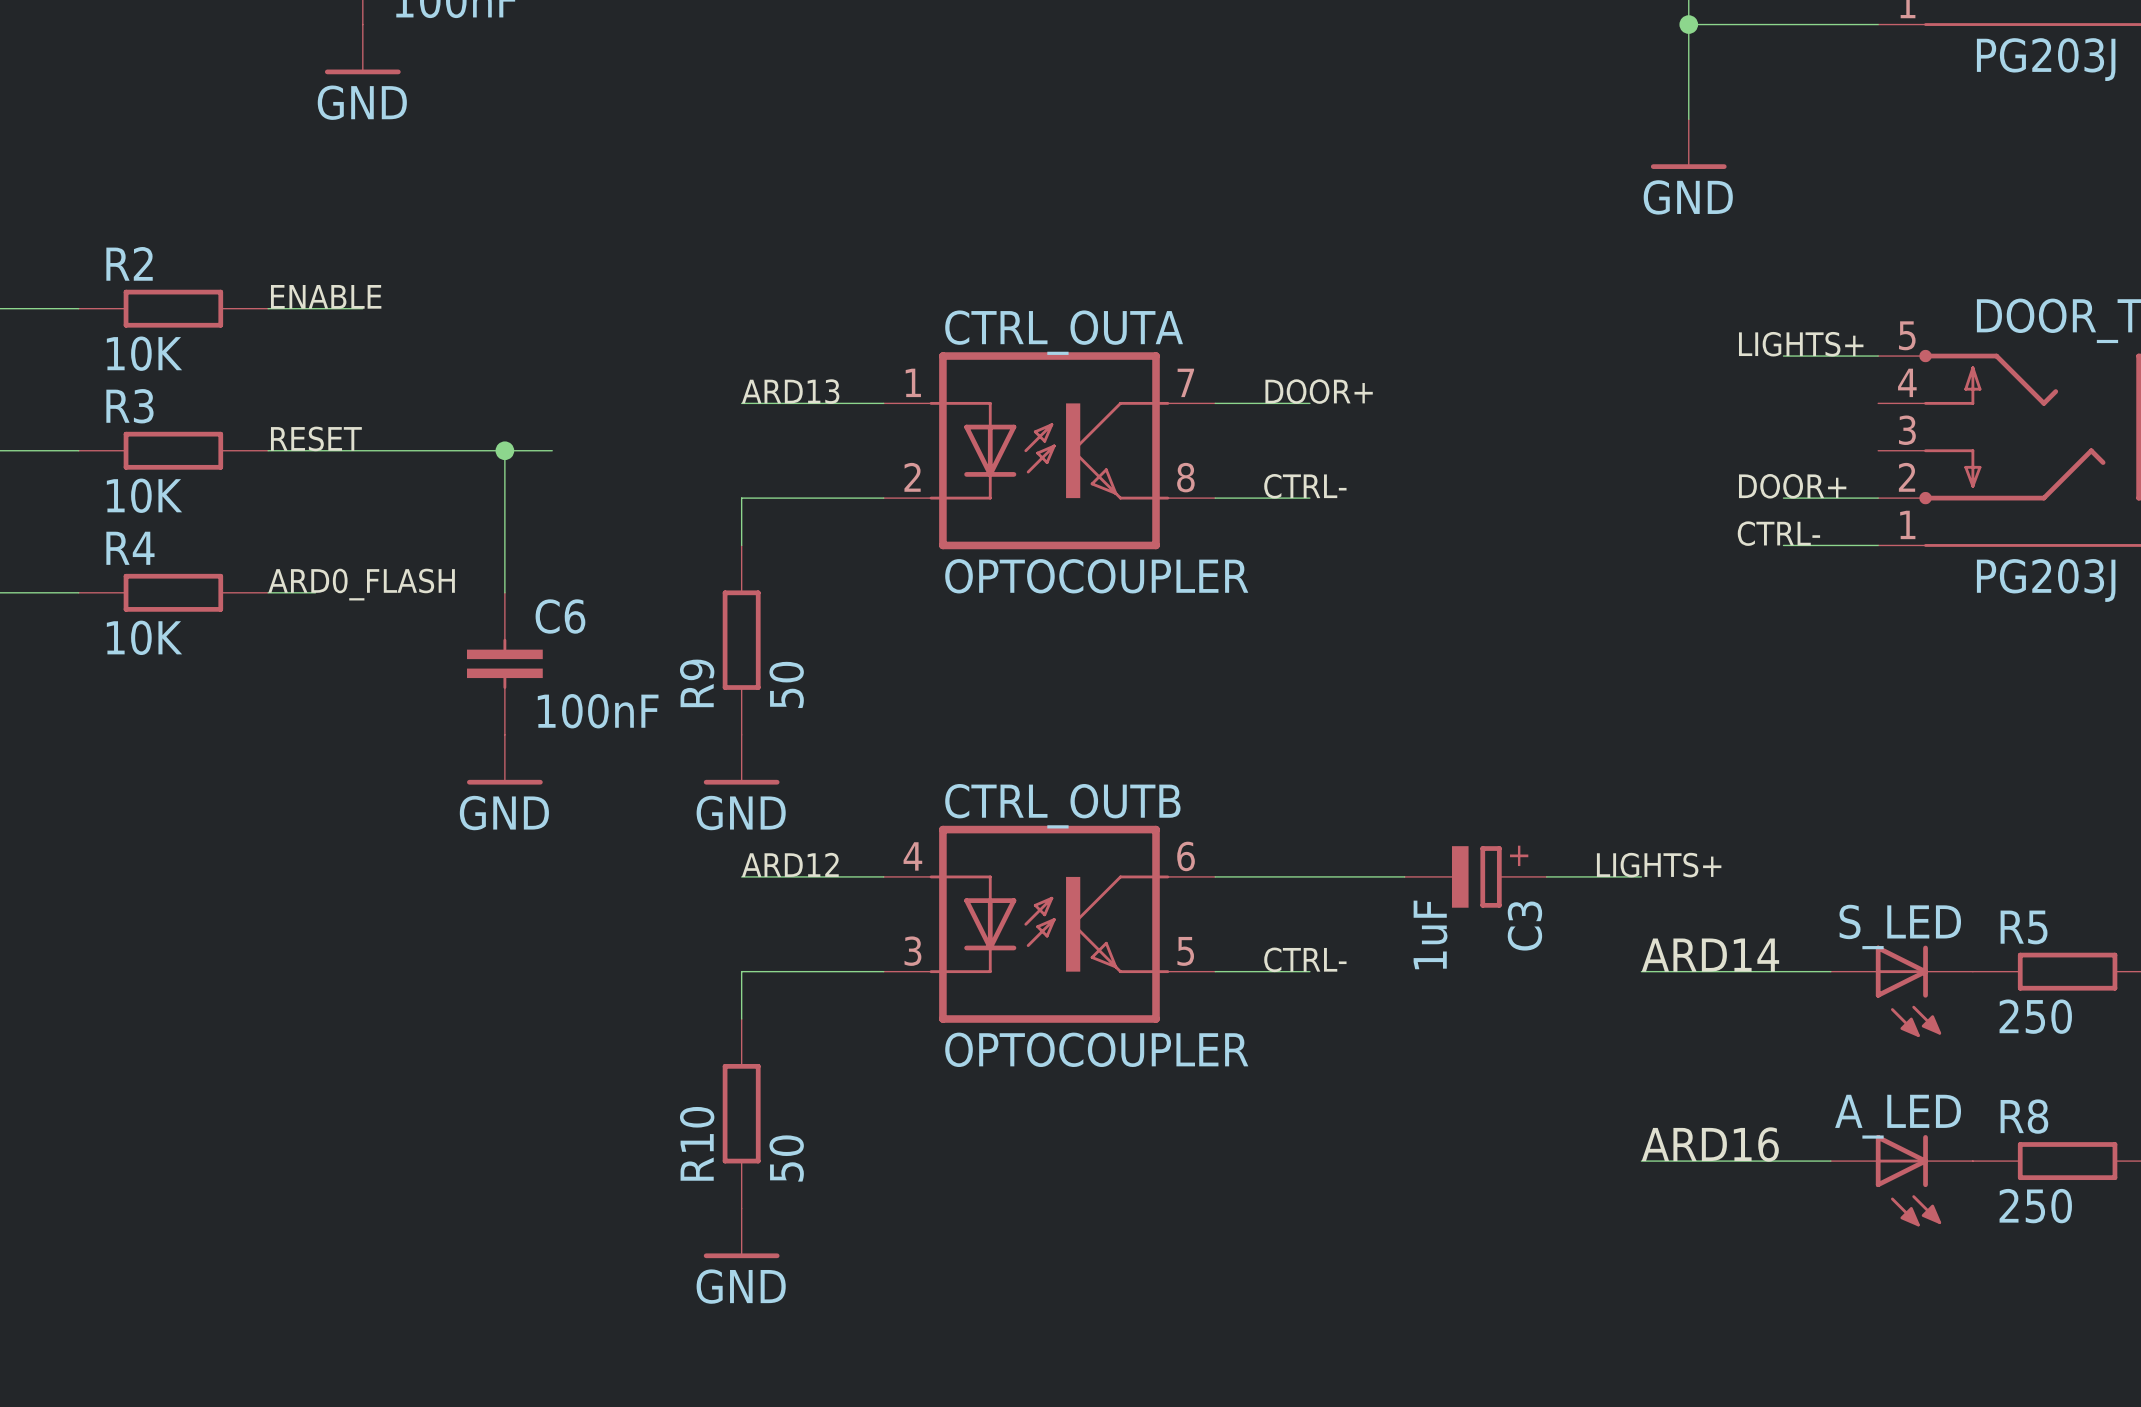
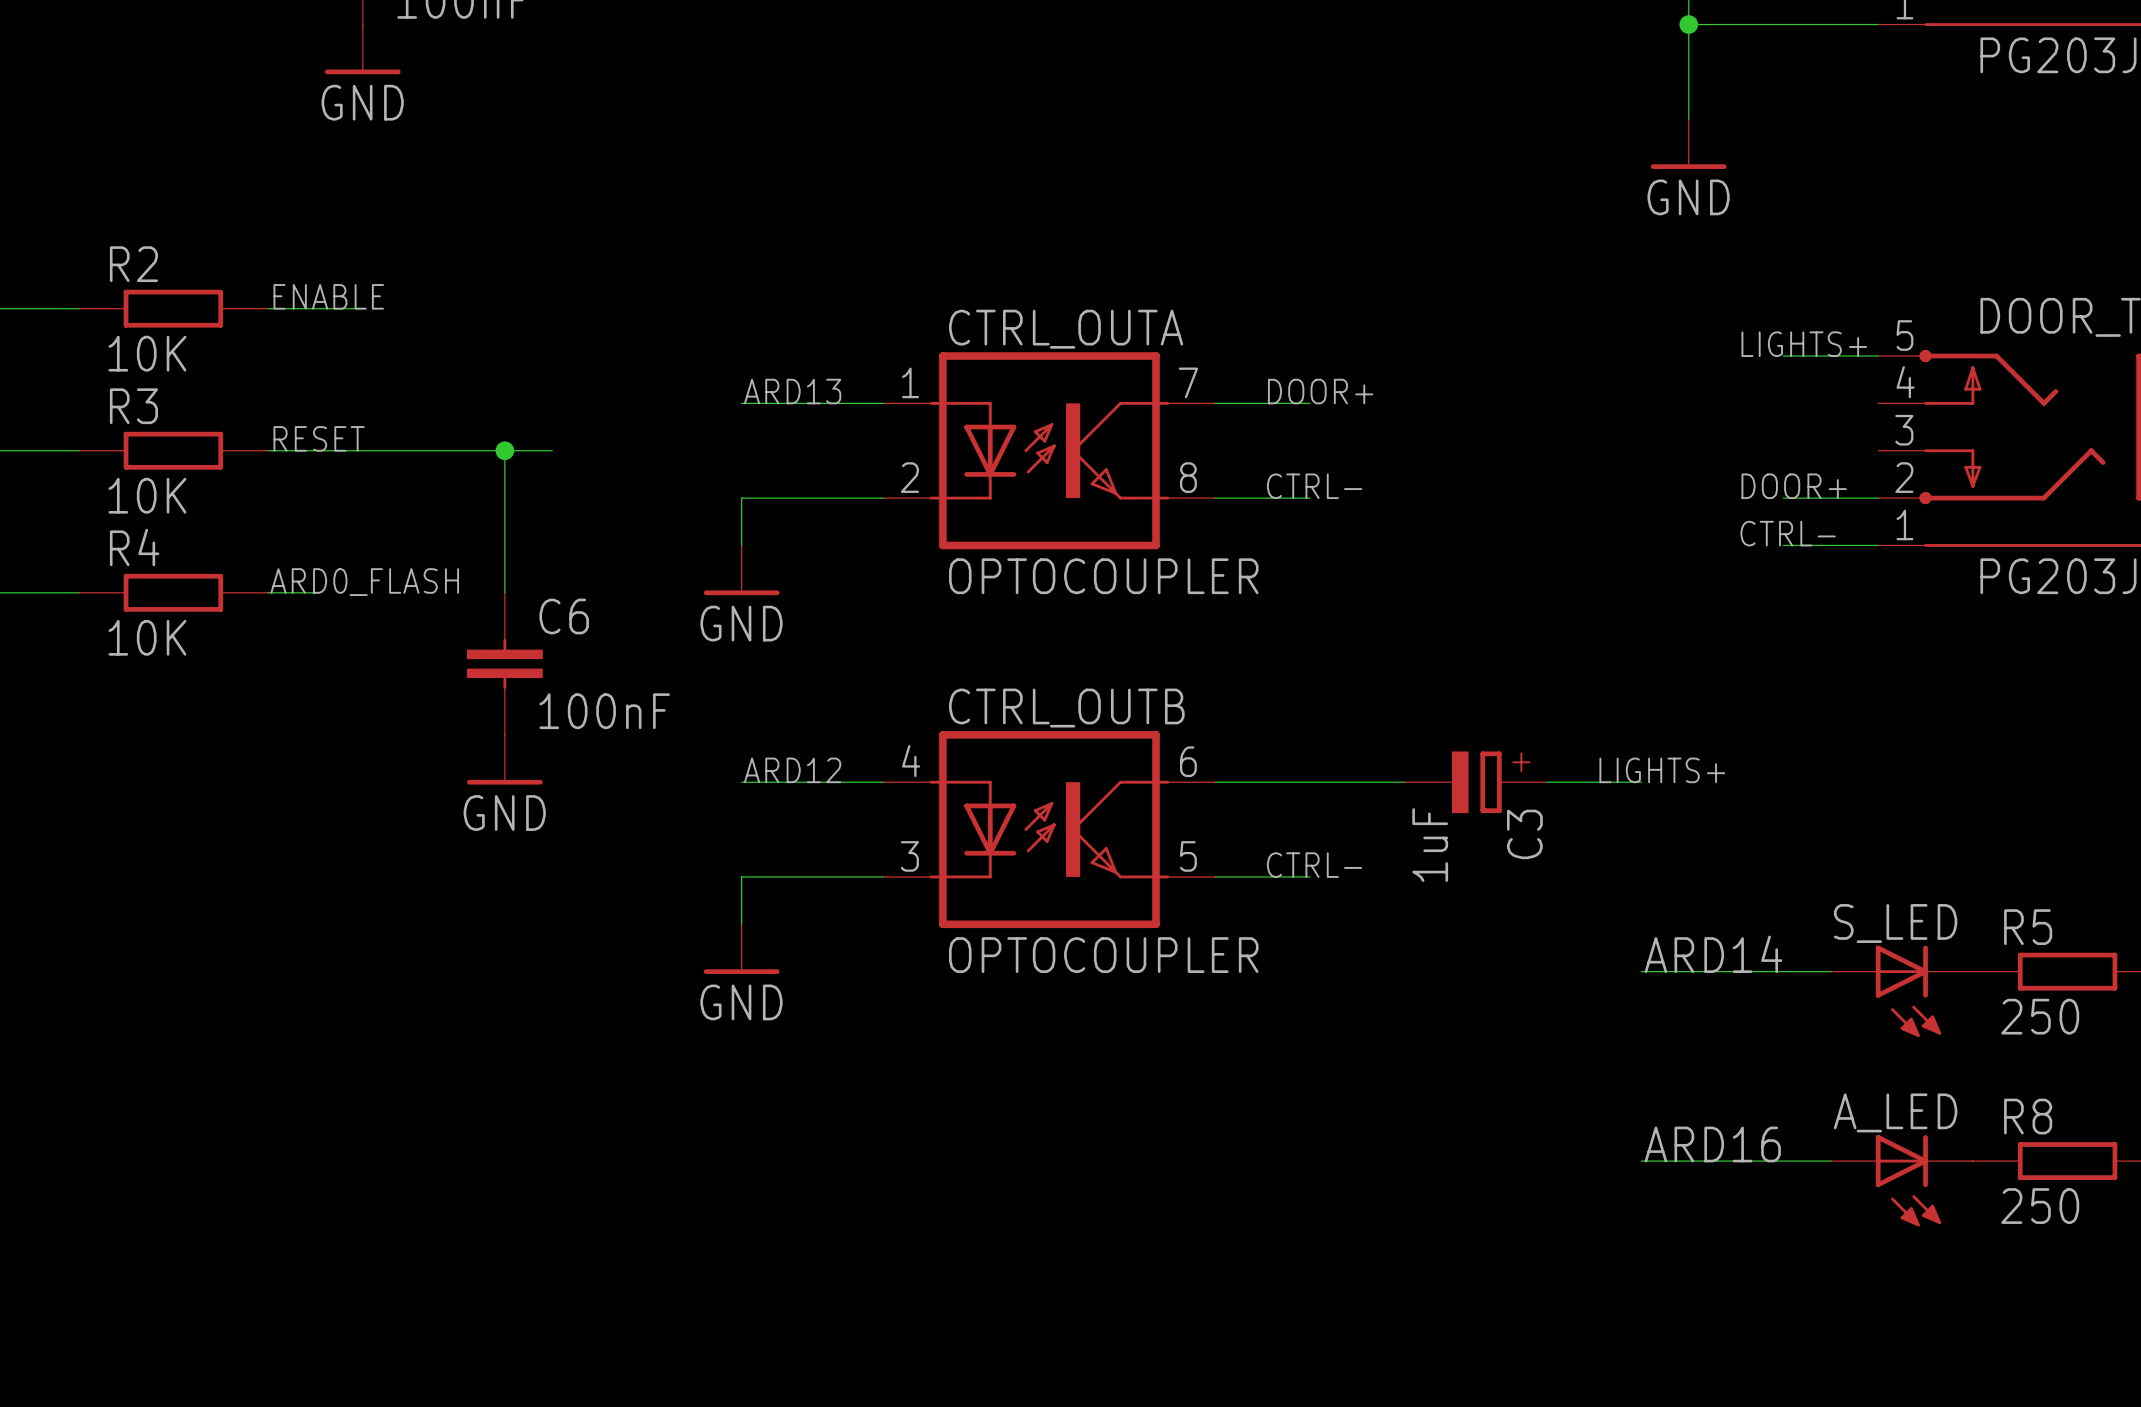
power symbol: none -> GND (741, 570)
R9: 50 (741, 640) -> none
power symbol: GND (741, 759) -> none
wire: none -> (741, 782) (883, 782)
wire: none -> (1215, 782) (1404, 782)
label position: ARD12 (790, 864) -> ARD12 (792, 770)
label position: LIGHTS+ (1659, 865) -> LIGHTS+ (1662, 770)
wire: none -> (741, 876) (741, 924)
wire: (1309, 876) (1404, 876) -> none
C3 position: (1475, 876) -> (1475, 782)
wire: (1546, 876) (1641, 876) -> (1546, 782) (1641, 782)
CTRL_OUTB position: (1049, 924) -> (1049, 829)
power symbol: none -> GND (741, 949)
label position: CTRL- (1305, 959) -> CTRL- (1314, 865)
wire: (883, 971) (741, 971) (741, 1019) -> none
wire: (1215, 971) (1309, 971) -> none
R10: 50 (741, 1113) -> none
power symbol: GND (741, 1233) -> none

